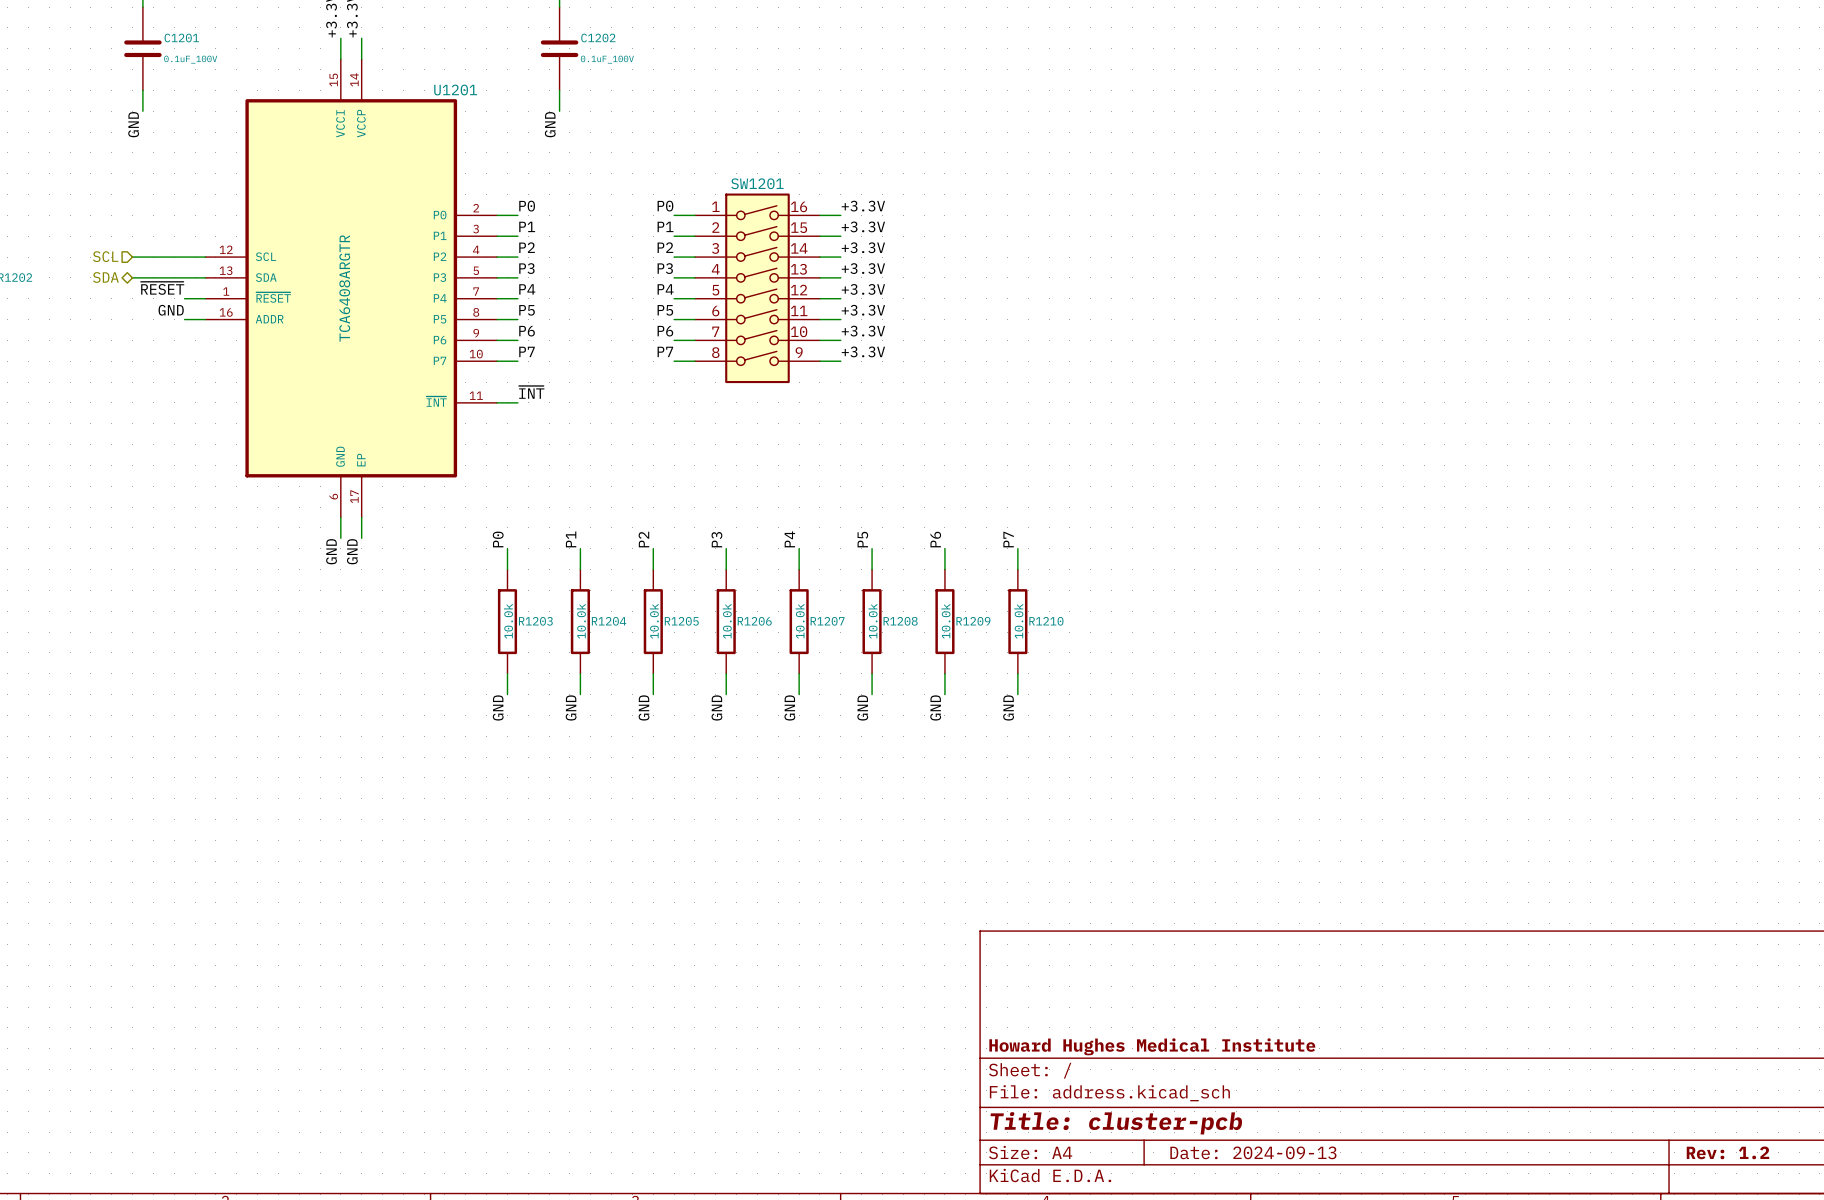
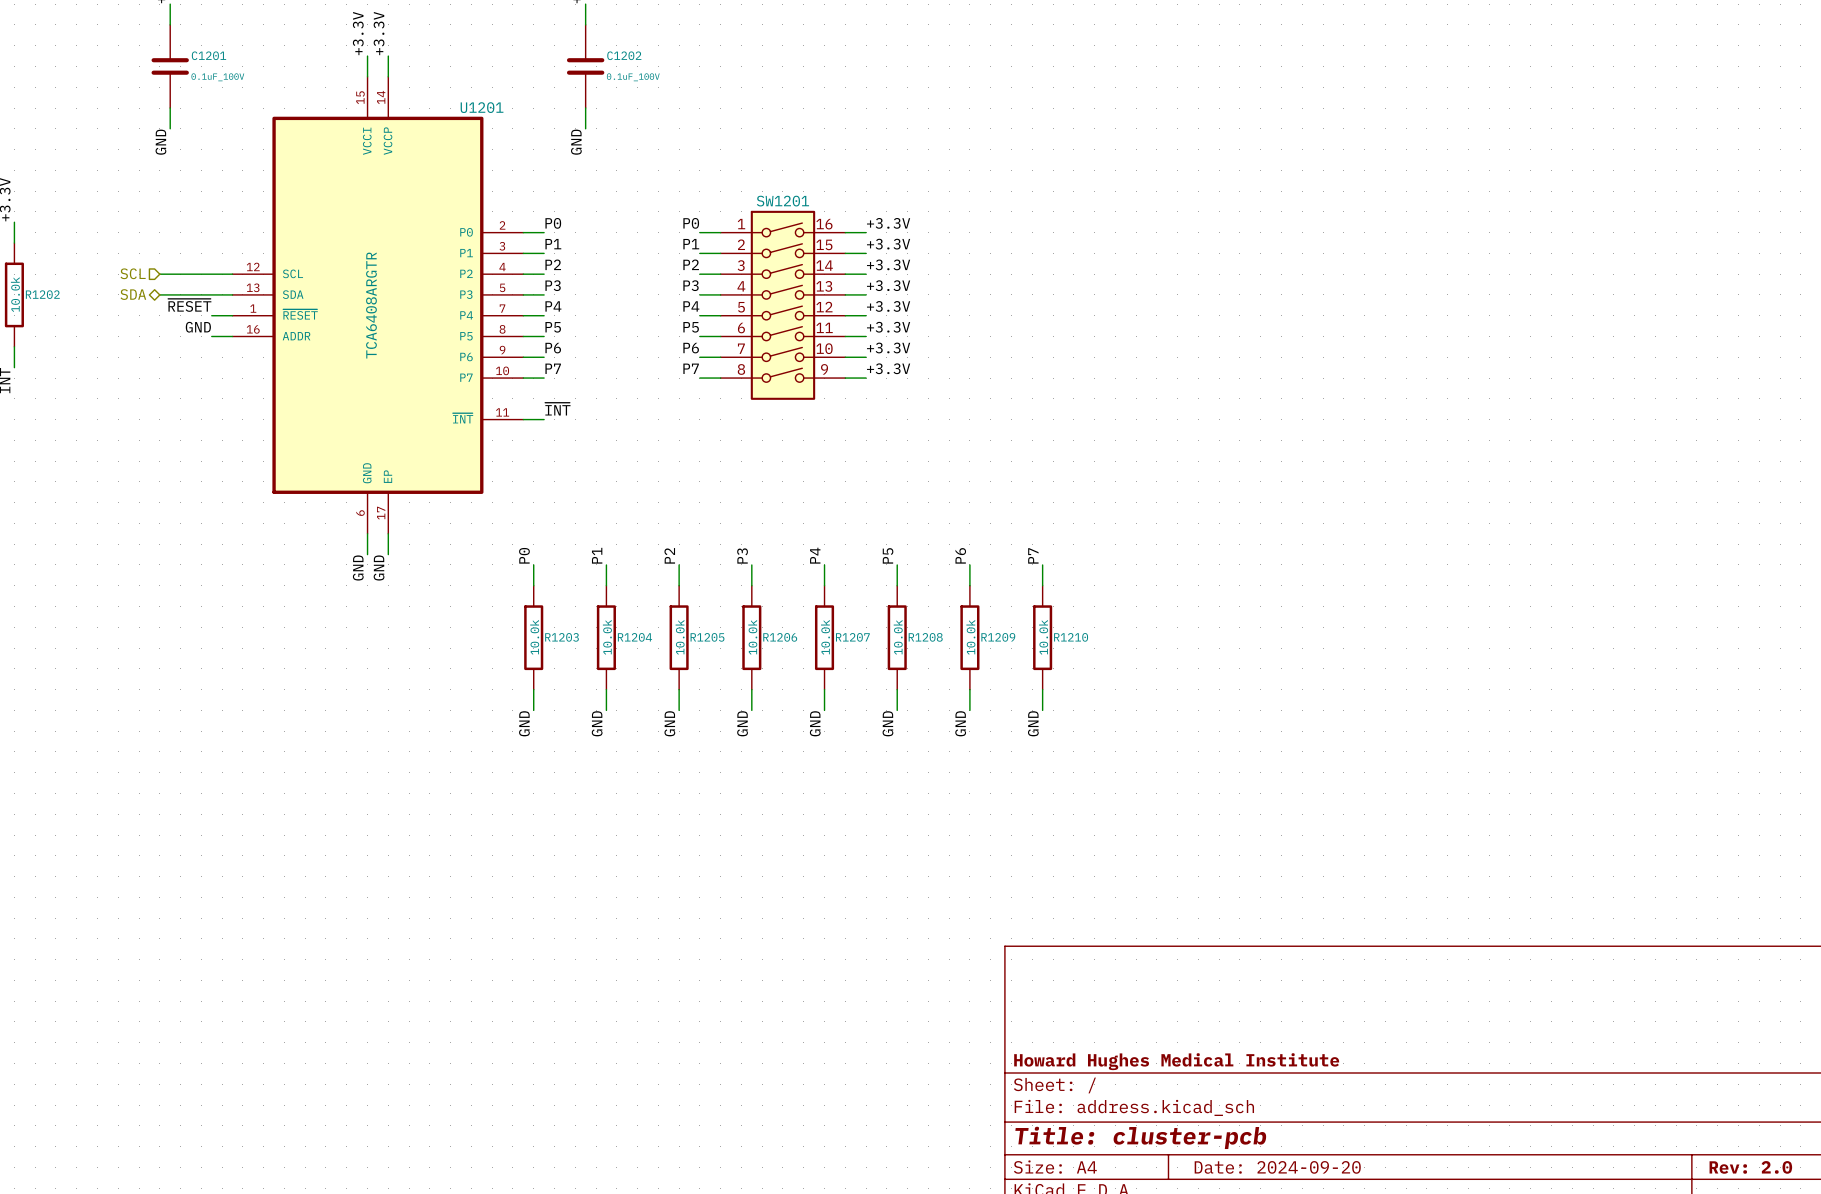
title block: Date: 2024-09-13 (1253, 1152) -> Date: 2024-09-20 (1277, 1167)
title block: Rev: 1.2 (1727, 1152) -> Rev: 2.0 (1750, 1167)

